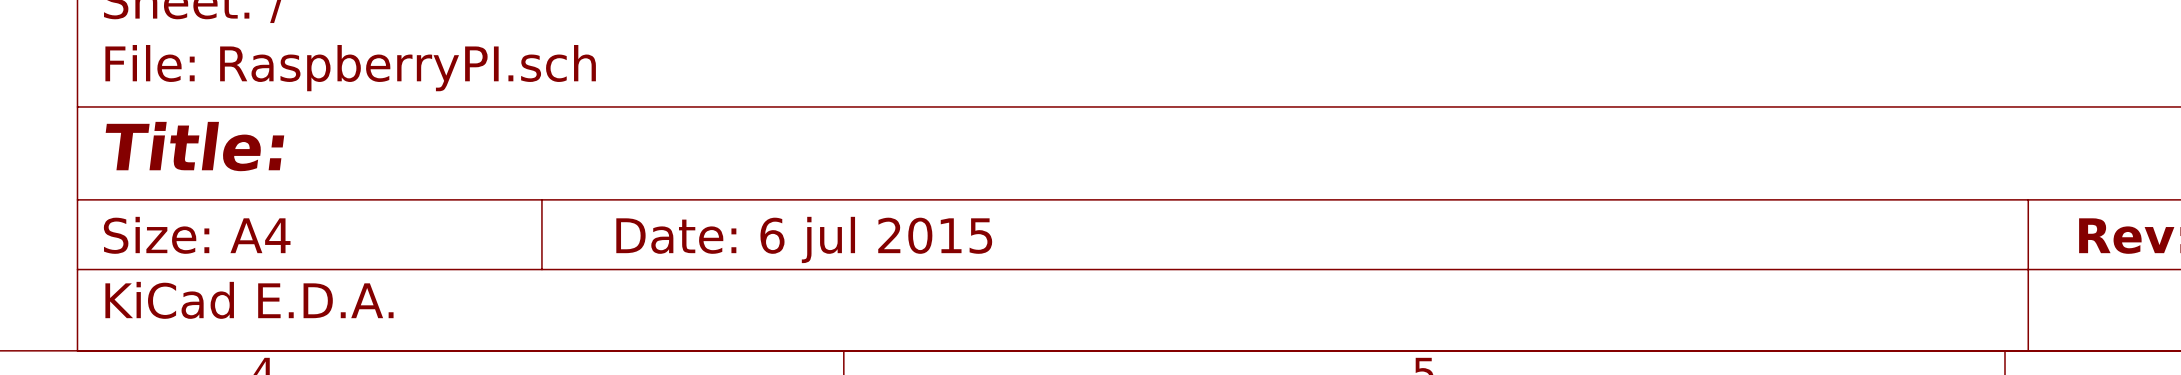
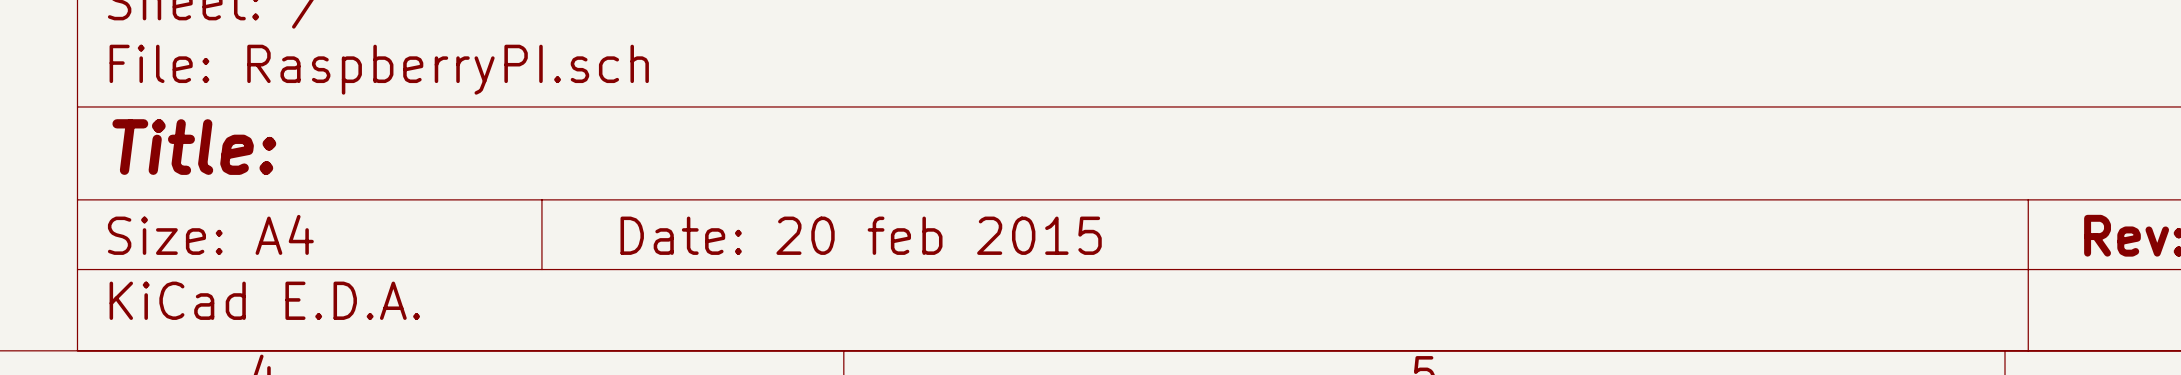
title block: Date: 6 jul 2015 (804, 239) -> Date: 20 feb 2015 (861, 235)

